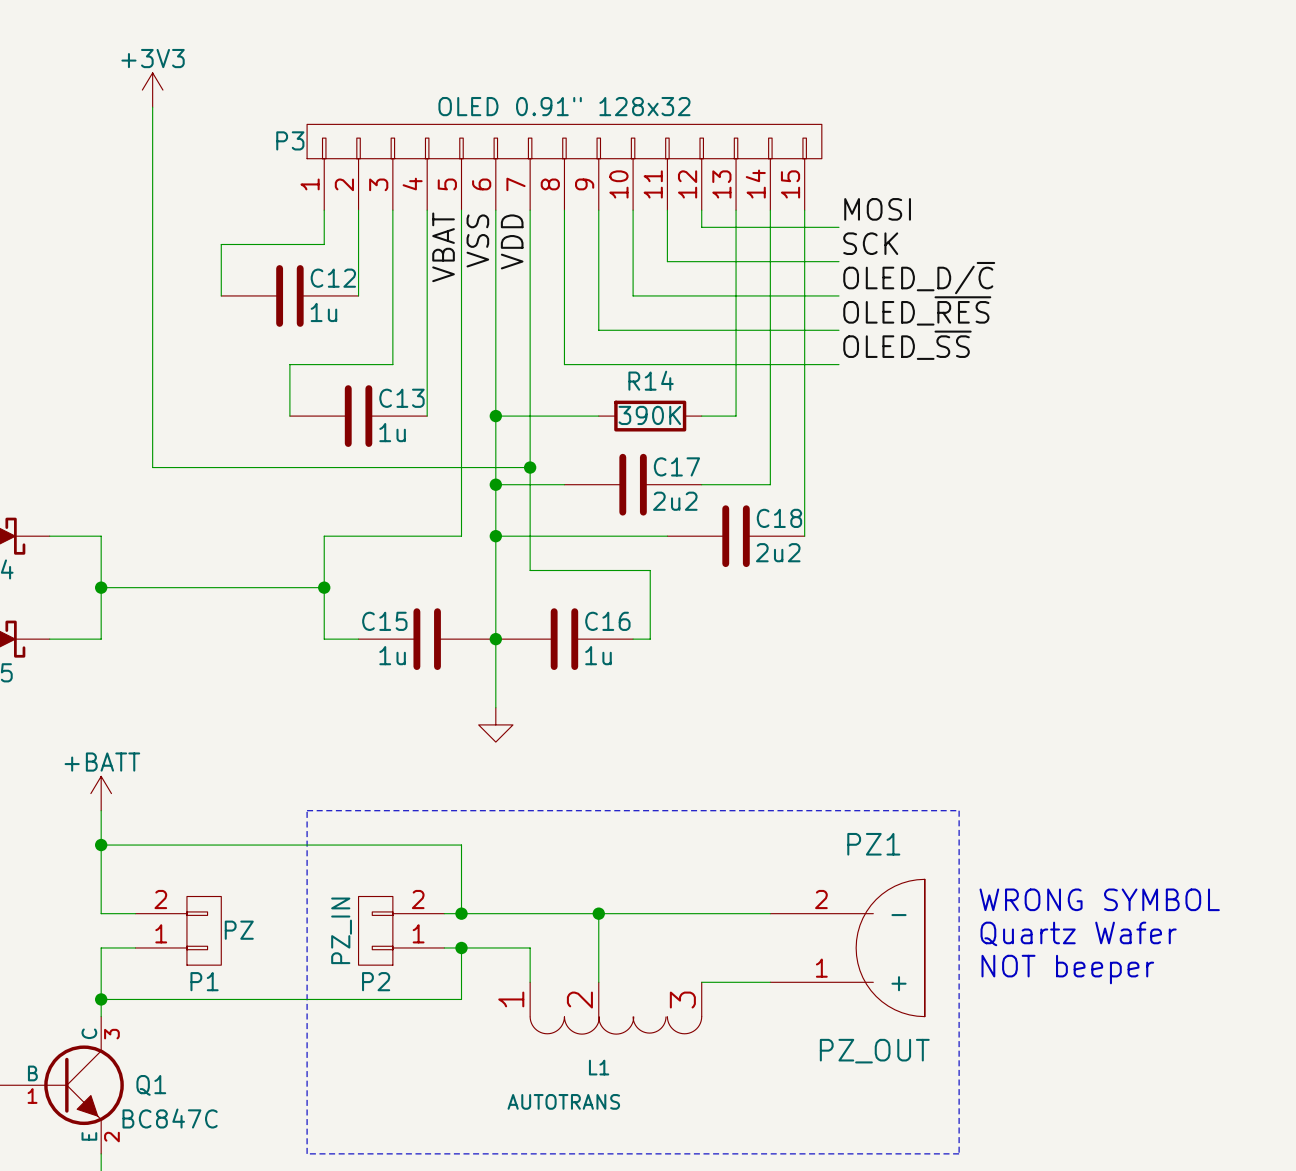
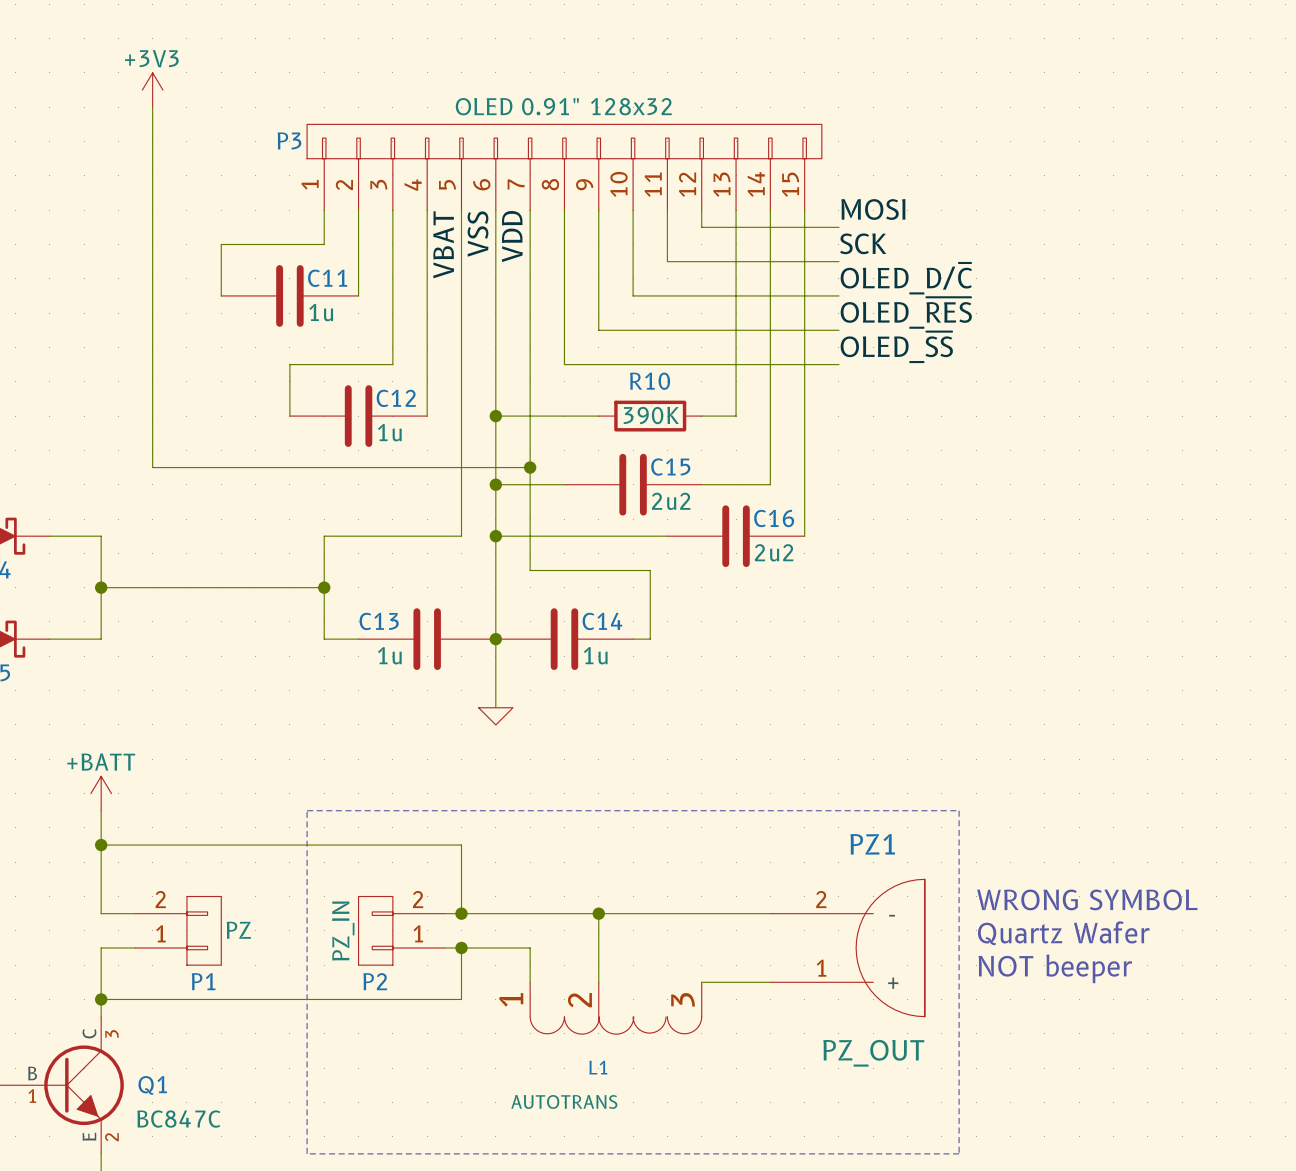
C12 name: C12 (333, 278) -> C11 (327, 278)
R14 name: R14 (651, 380) -> R10 (650, 381)
C13 name: C13 (401, 398) -> C12 (396, 398)
C17 name: C17 (676, 466) -> C15 (670, 467)
C18 name: C18 (779, 518) -> C16 (774, 518)
C15 name: C15 (384, 621) -> C13 (379, 621)
C16 name: C16 (607, 621) -> C14 (602, 621)
power symbol shape: [478, 707, 513, 743] -> [478, 707, 513, 725]

